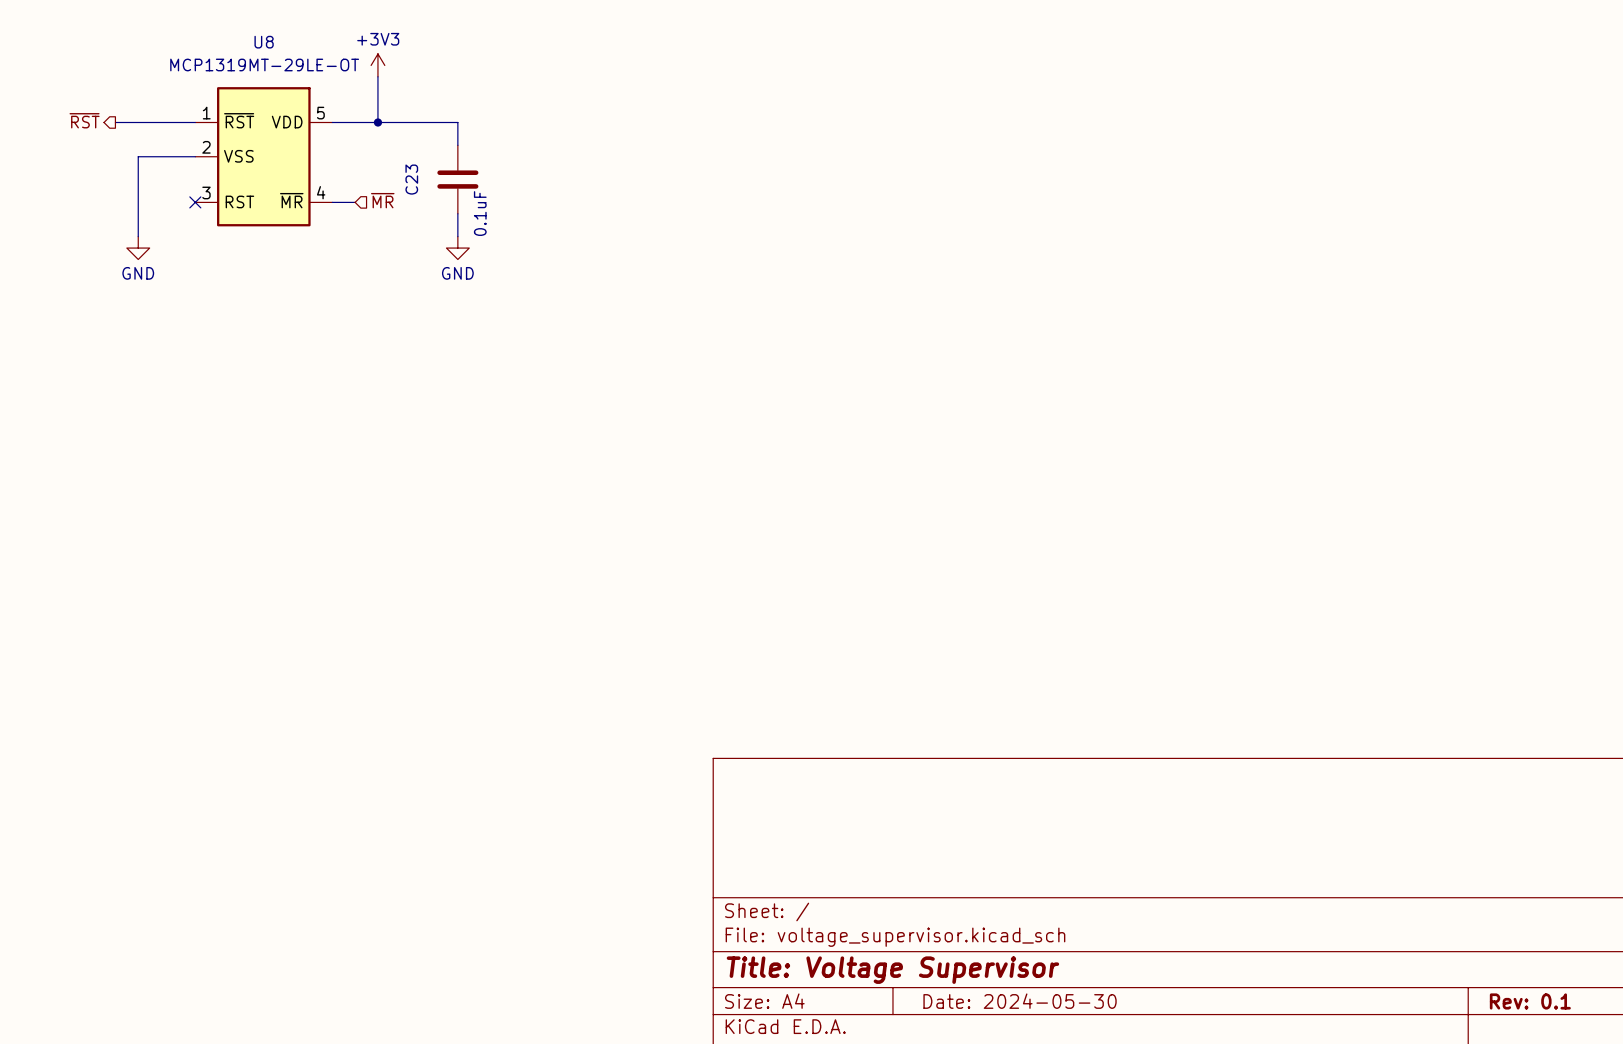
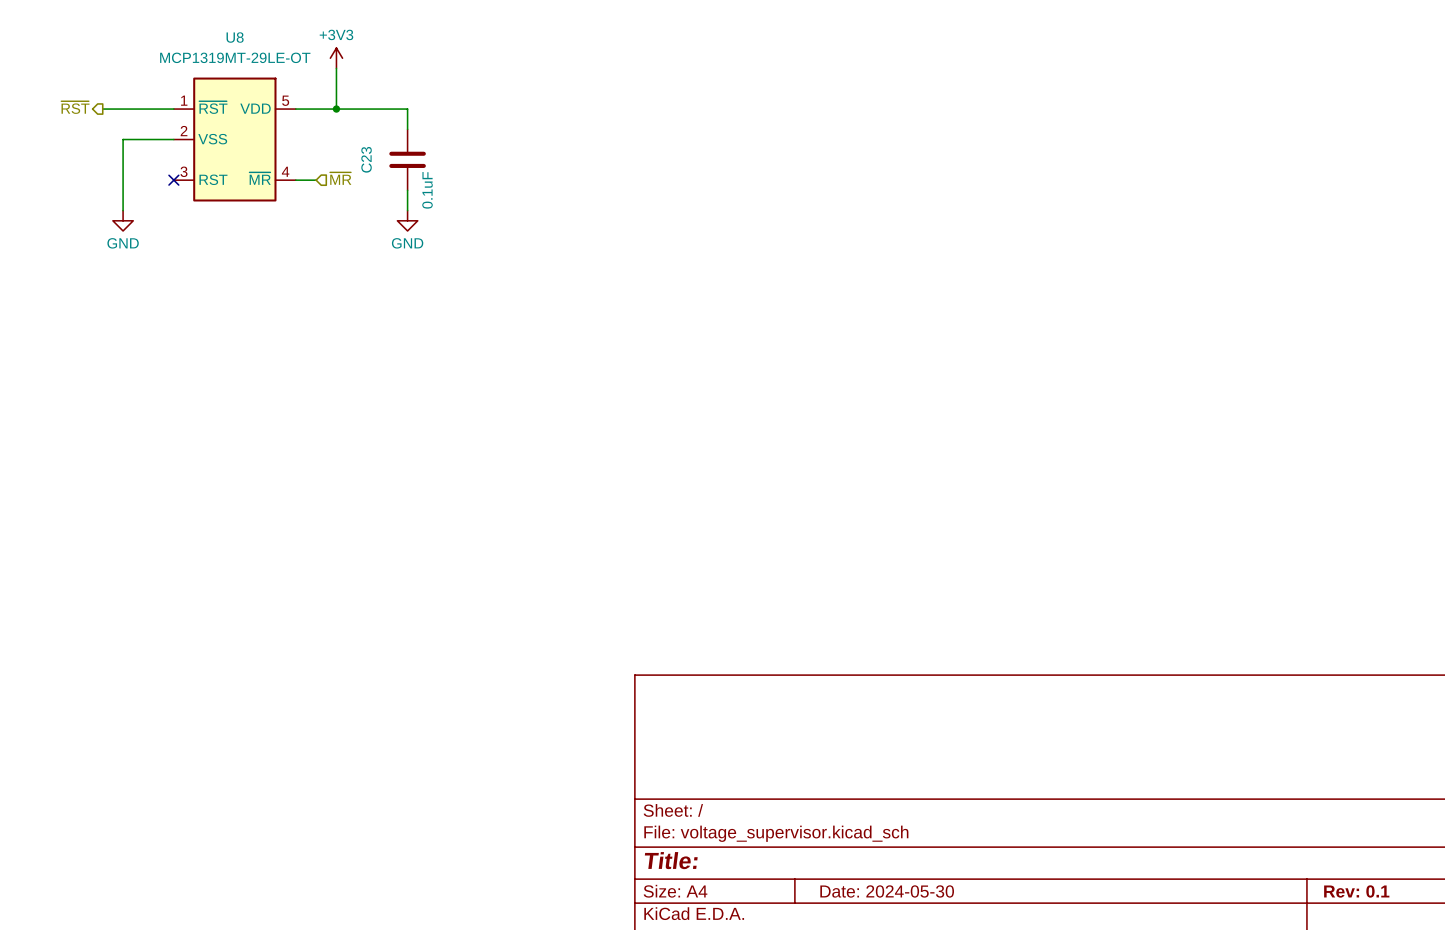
title block: Title: Voltage Supervisor (892, 970) -> Title: (671, 860)

